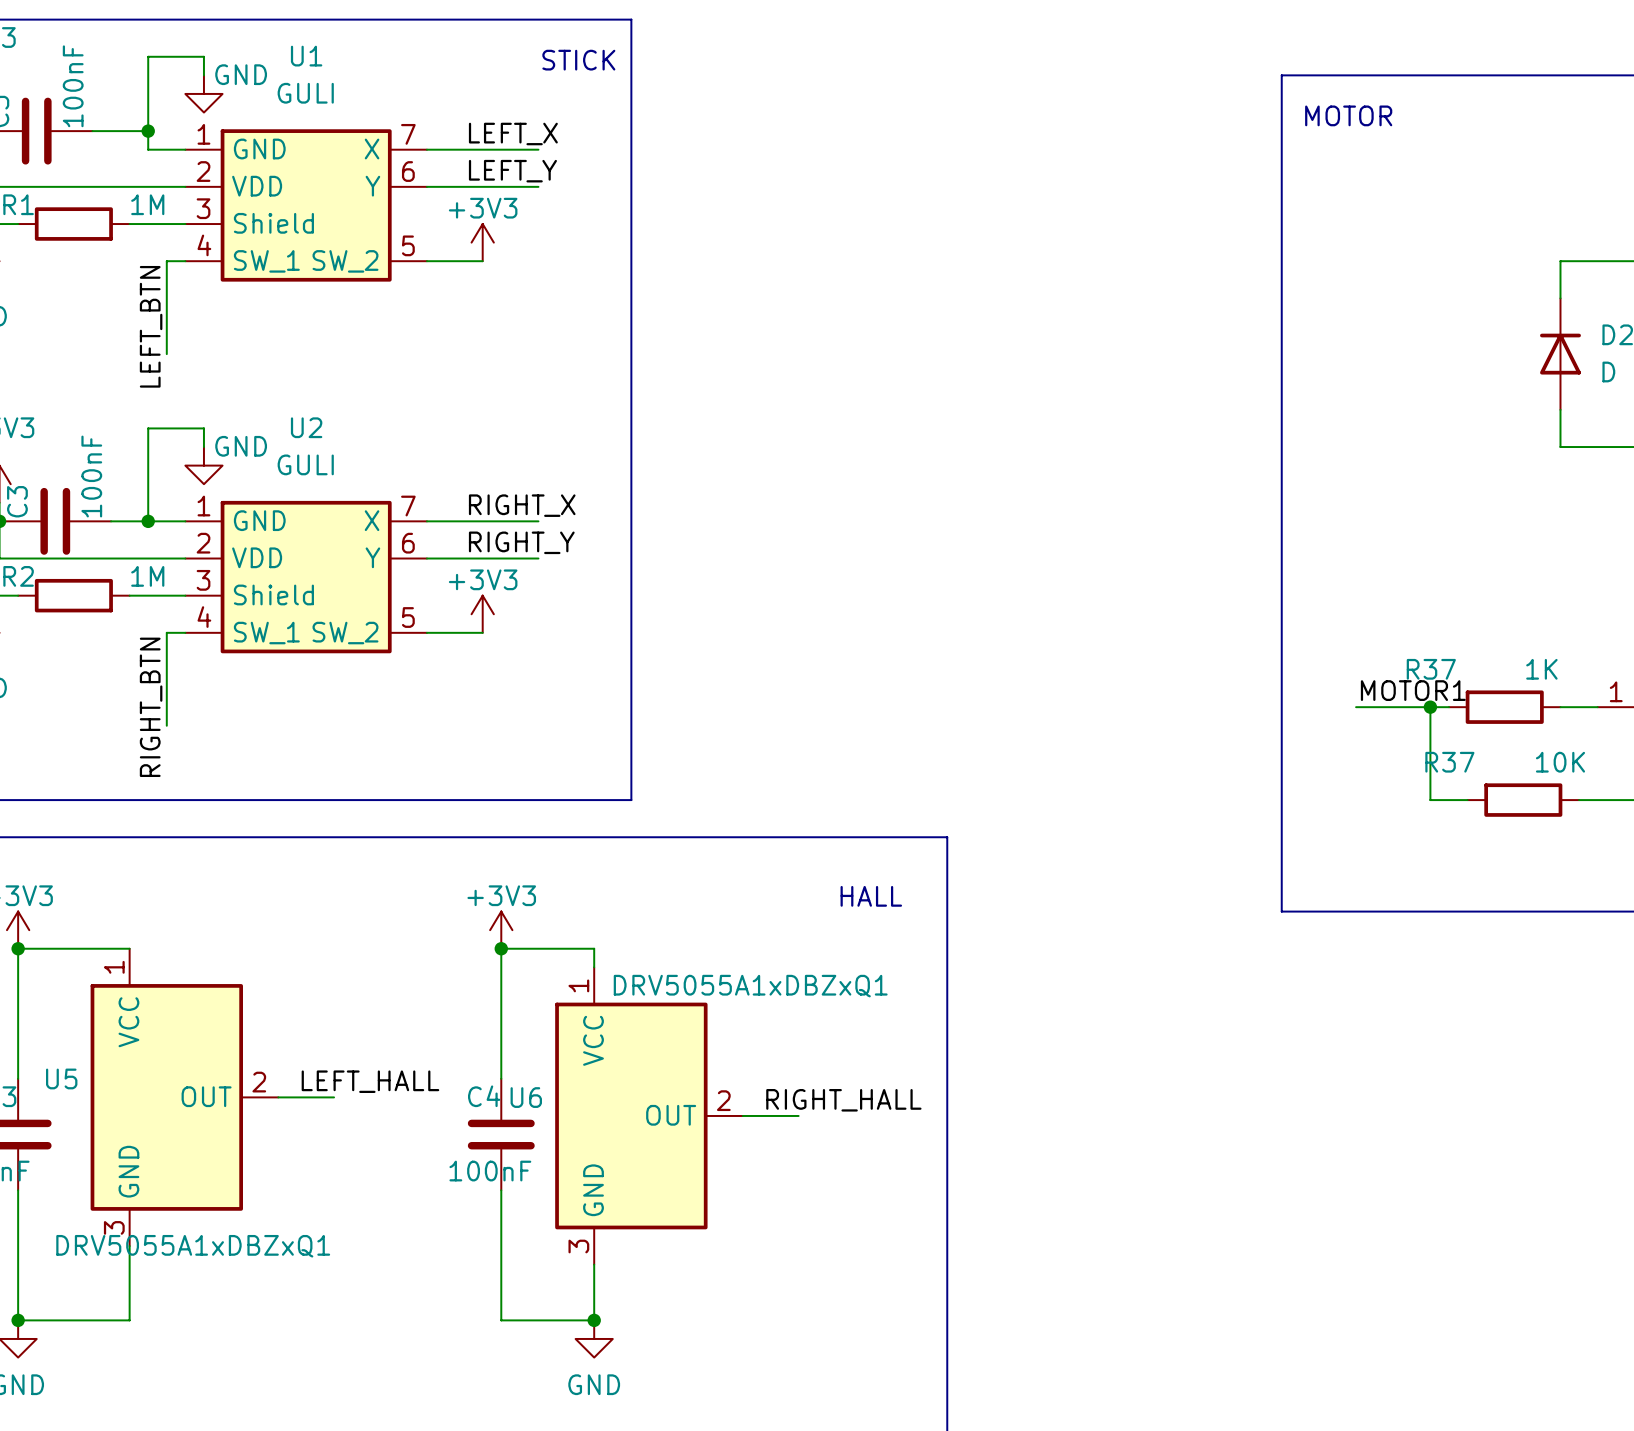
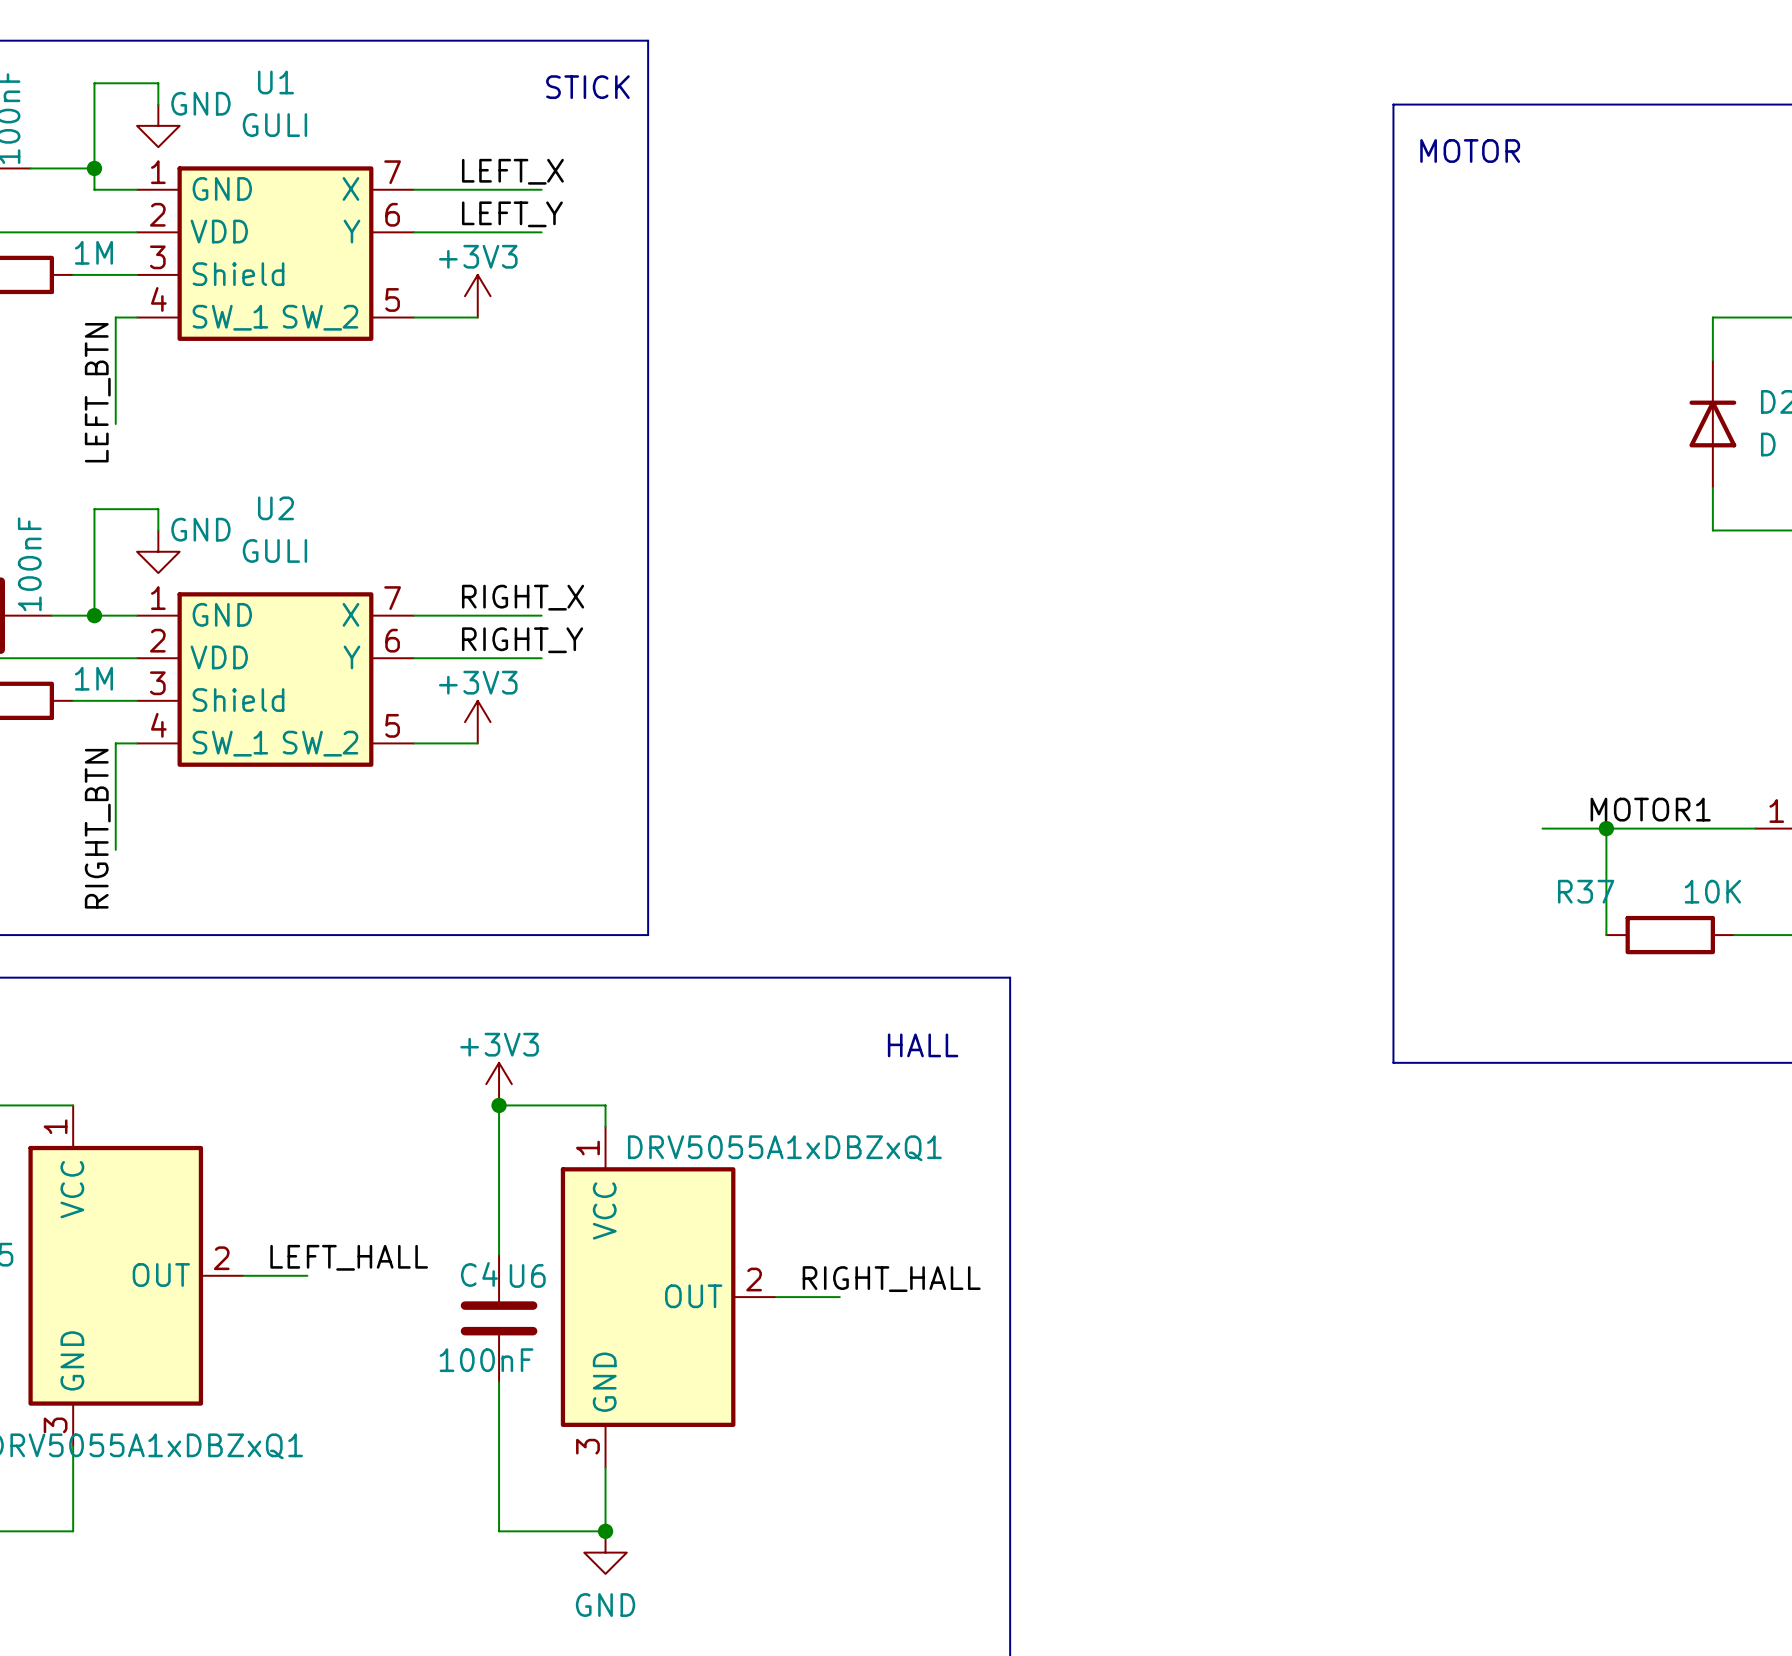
label position: MOTOR1 (1413, 690) -> MOTOR1 (1650, 809)
wire: (1356, 707) (1411, 707) -> none
wire: (1430, 707) (1430, 800) (1467, 800) -> (1606, 828) (1606, 935)
junction position: (1430, 707) -> (1606, 828)
wire: none -> (1585, 828) (1712, 828)
R37: 1K (1504, 707) -> none

